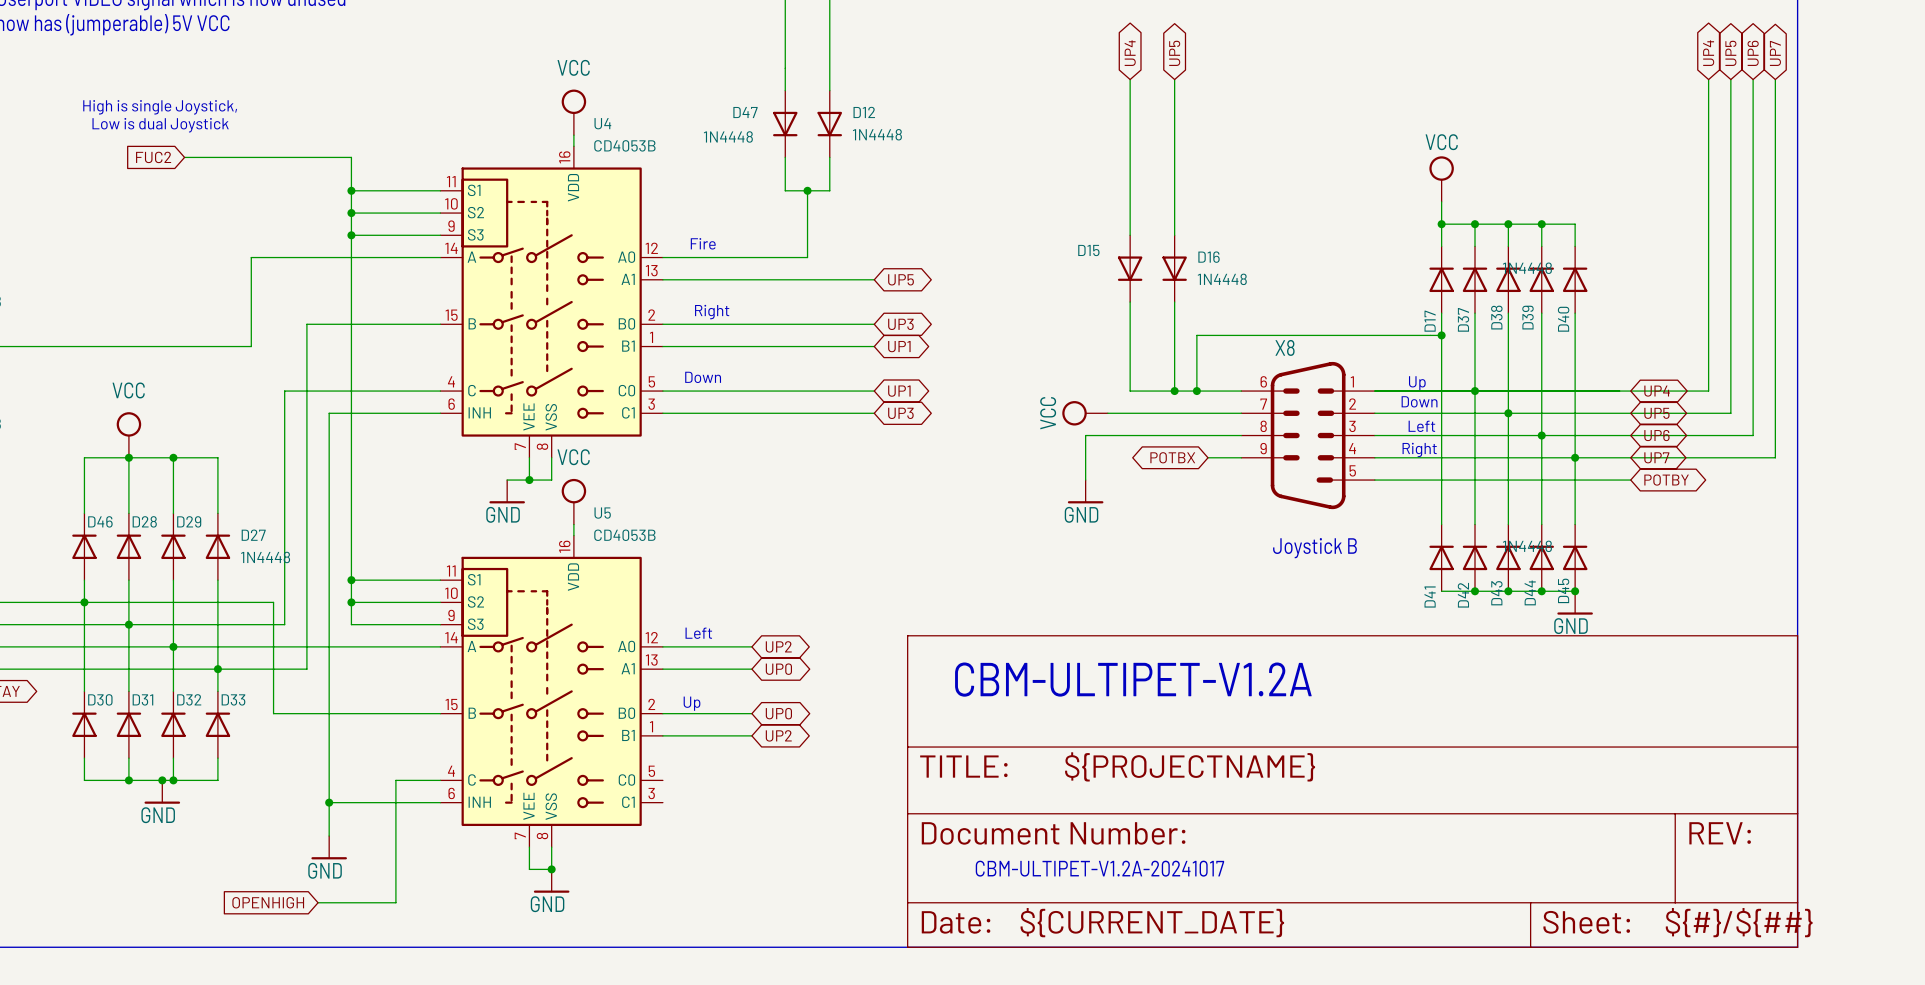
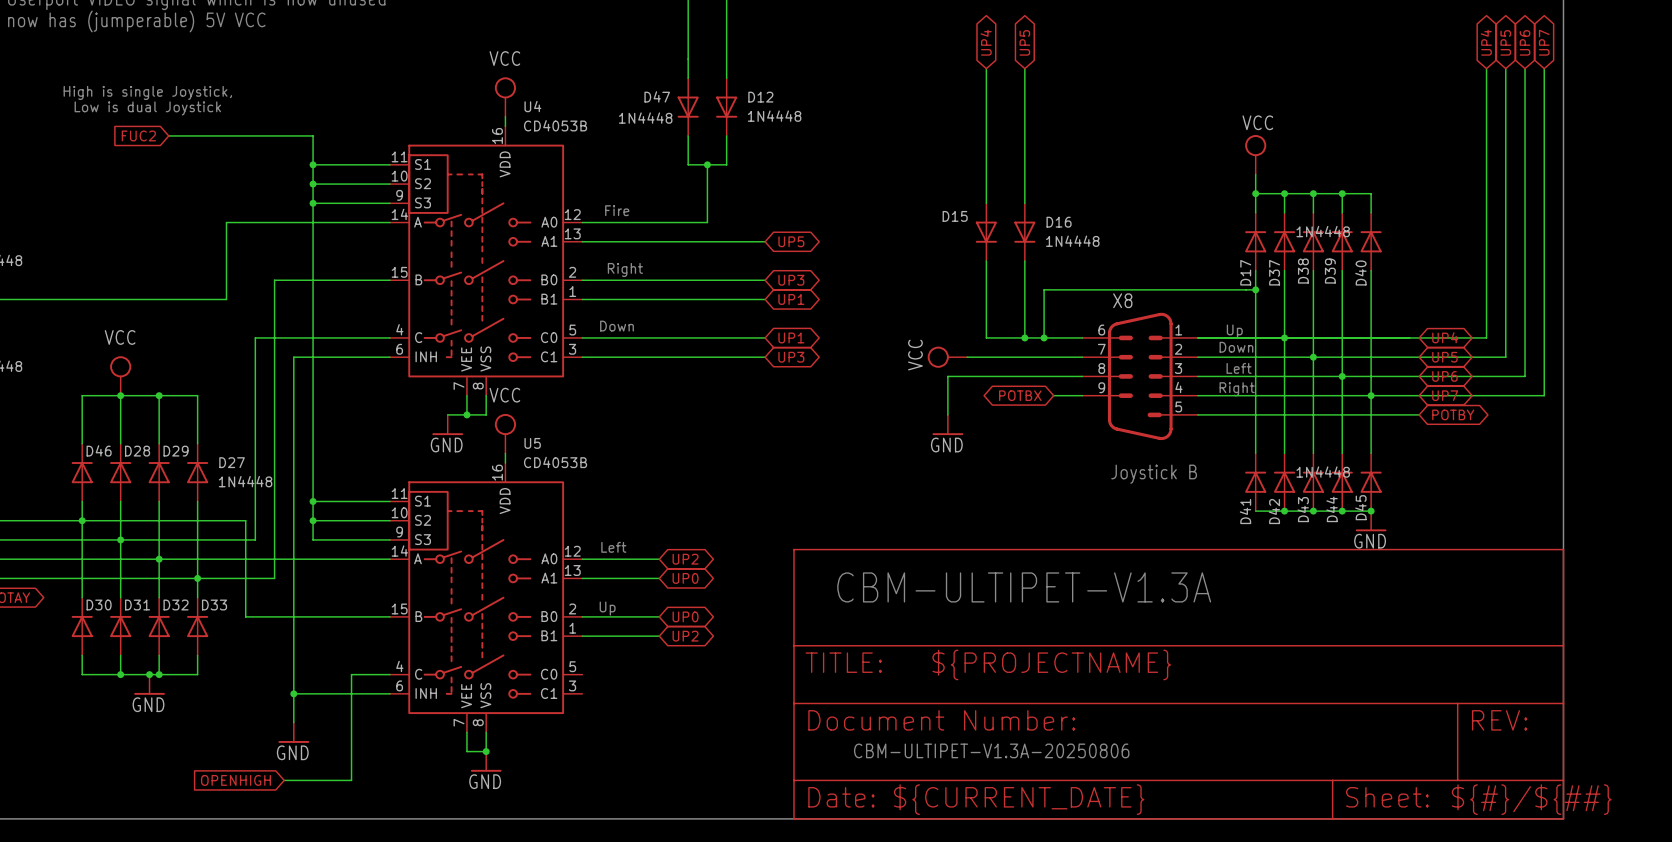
text: CBM-ULTIPET-V1.2A (1133, 679) -> CBM-ULTIPET-V1.3A (1024, 587)
text: CBM-ULTIPET-V1.2A-20241017 (1099, 868) -> CBM-ULTIPET-V1.3A-20250806 (991, 750)

